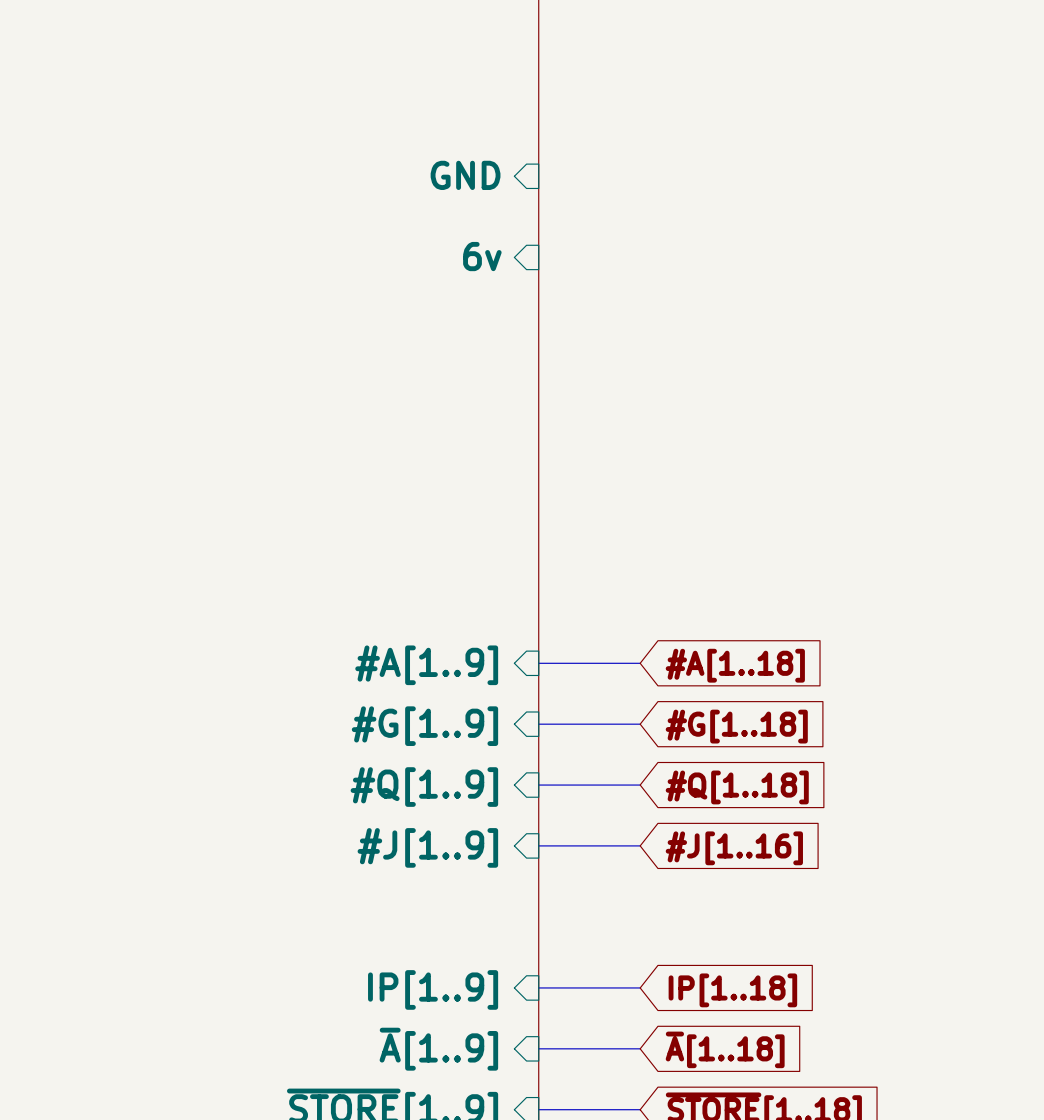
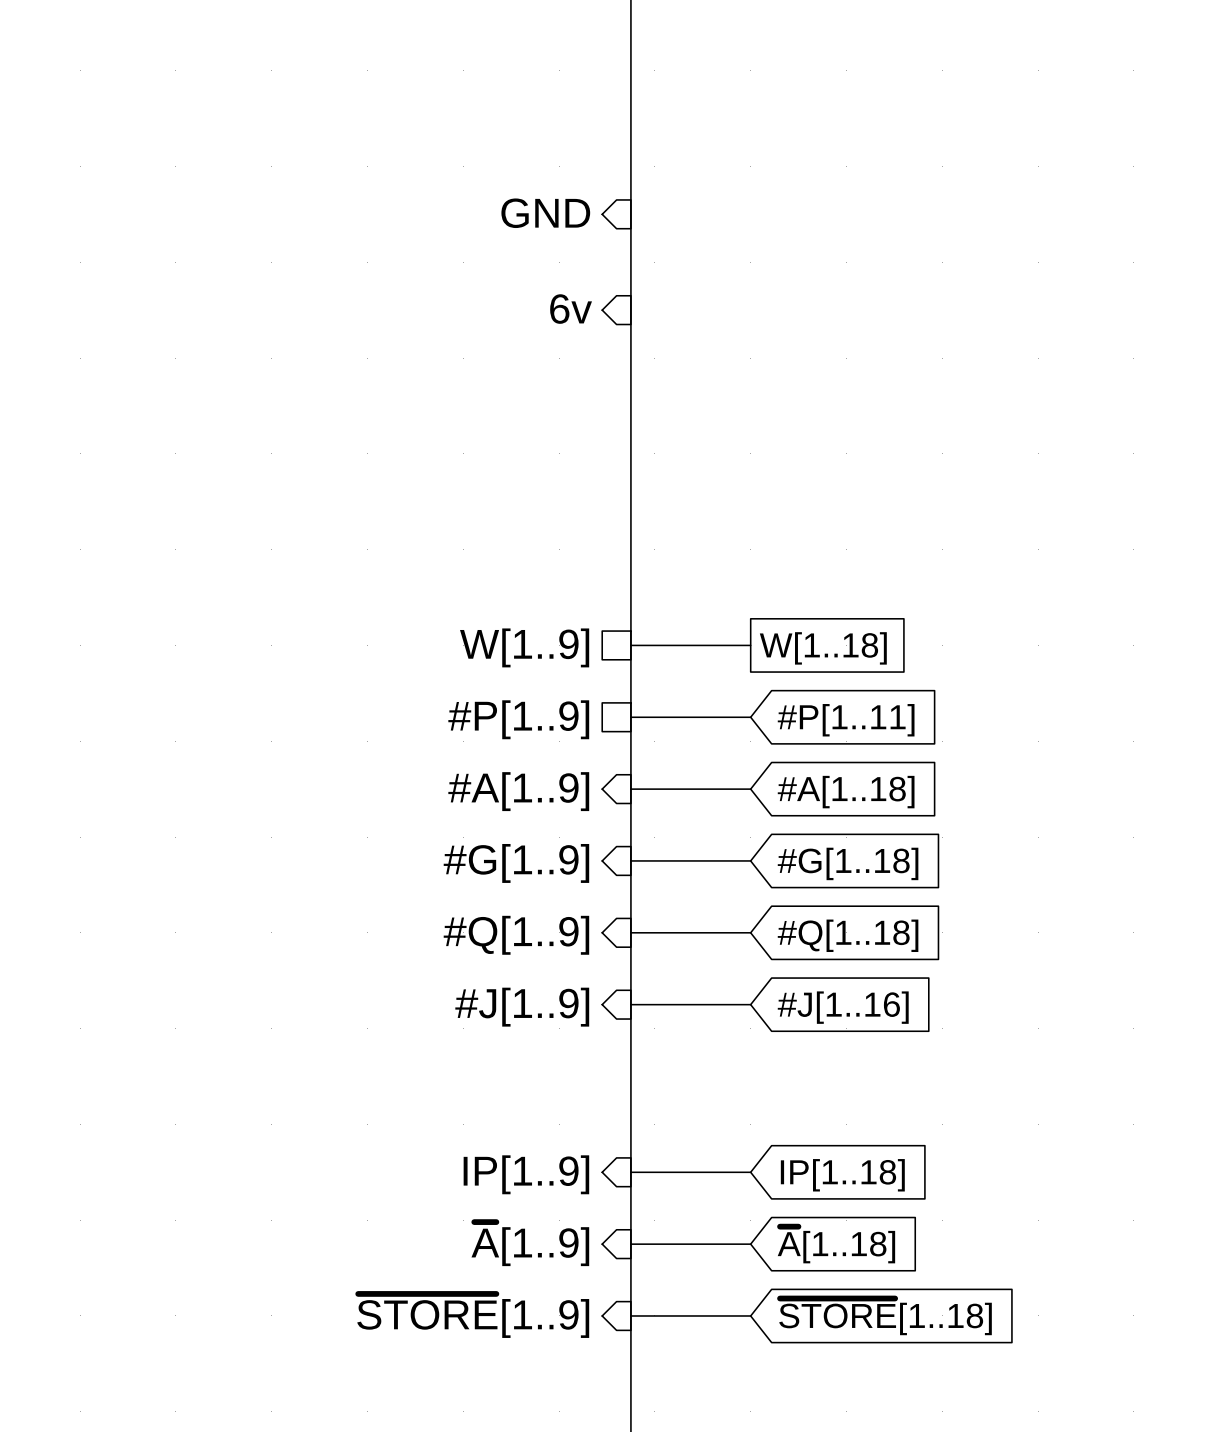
bus: none -> (630, 645) (750, 645)
sheet pin: none -> W[1..9] (524, 647)
global label: none -> W[1..18] (823, 648)
bus: none -> (630, 717) (750, 717)
sheet pin: none -> #P[1..9] (518, 719)
global label: none -> #P[1..11] (846, 720)

